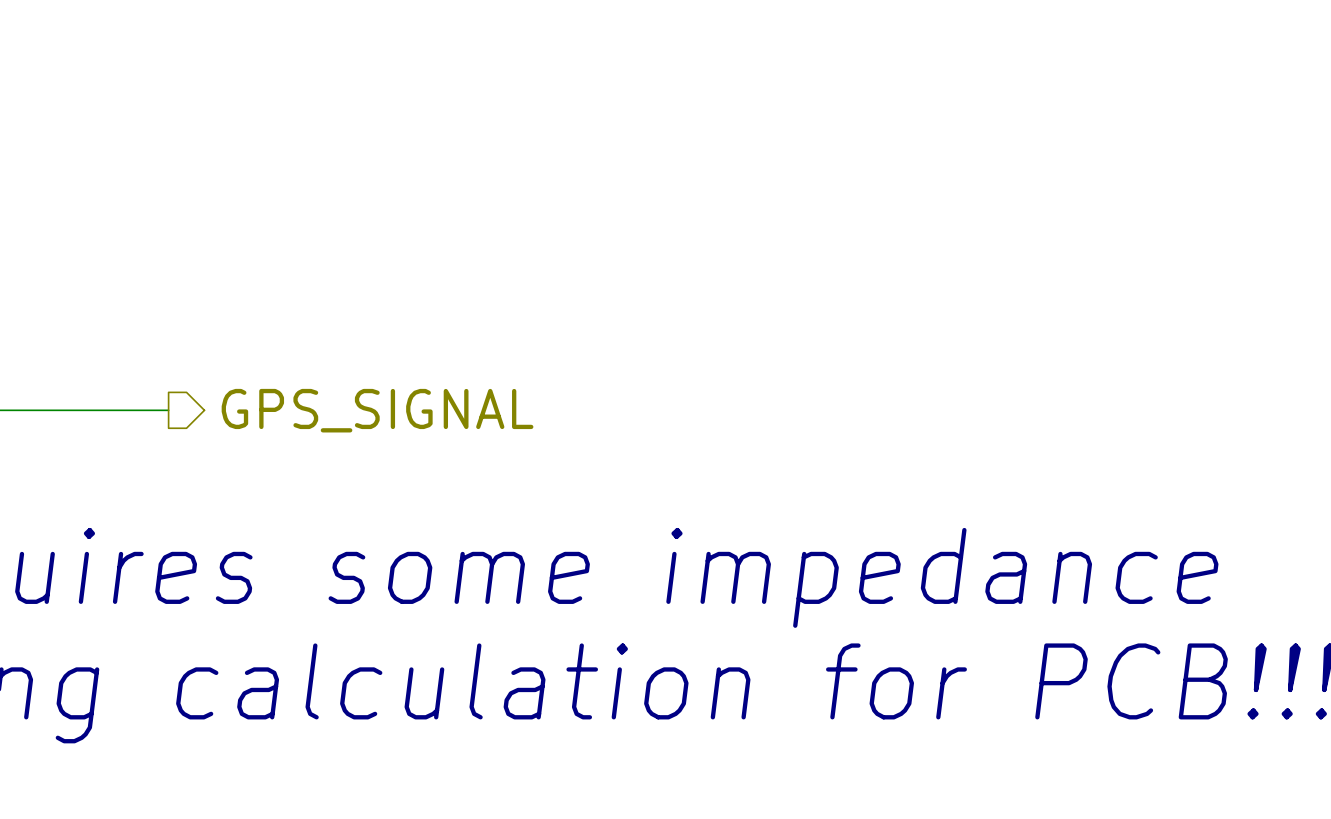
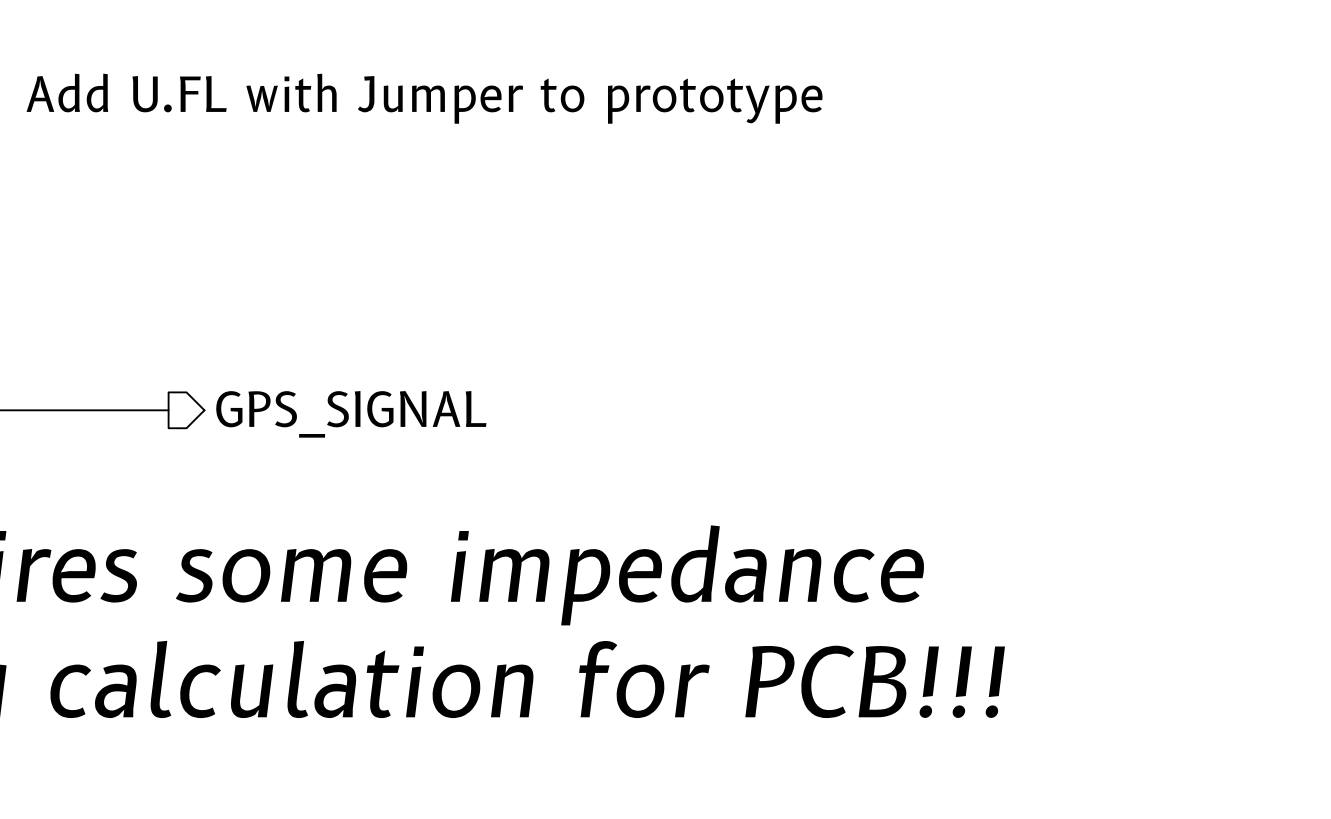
text: none -> Add U.FL with Jumper to prototype (424, 98)

